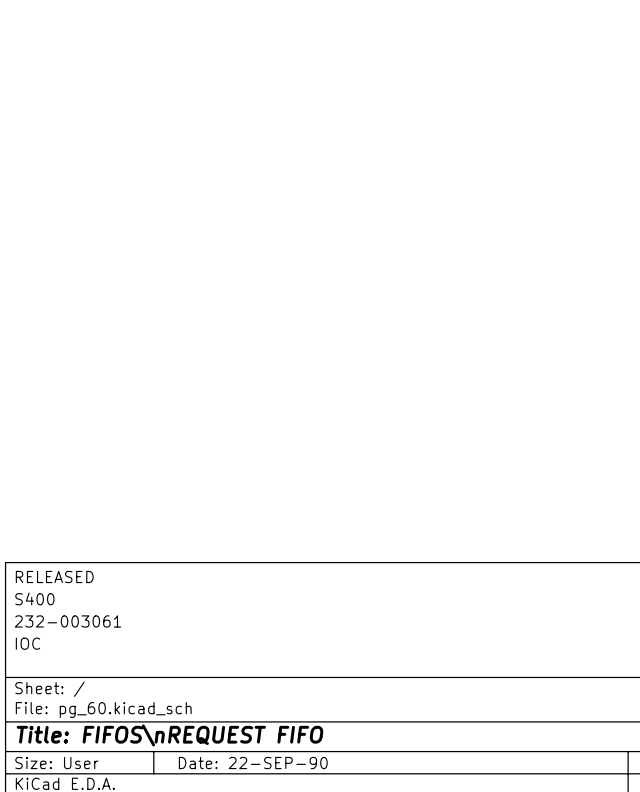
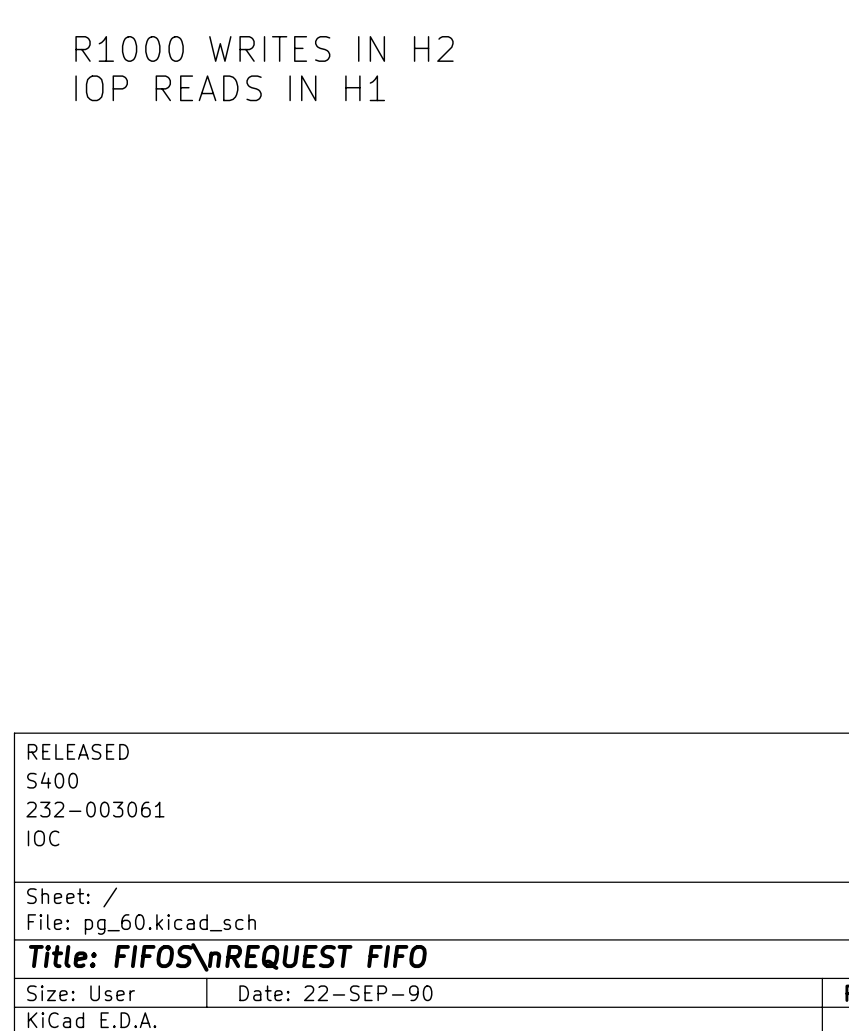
text: none -> R1000 WRITES IN H2 (264, 48)
text: none -> IOP READS IN H1 (230, 88)

